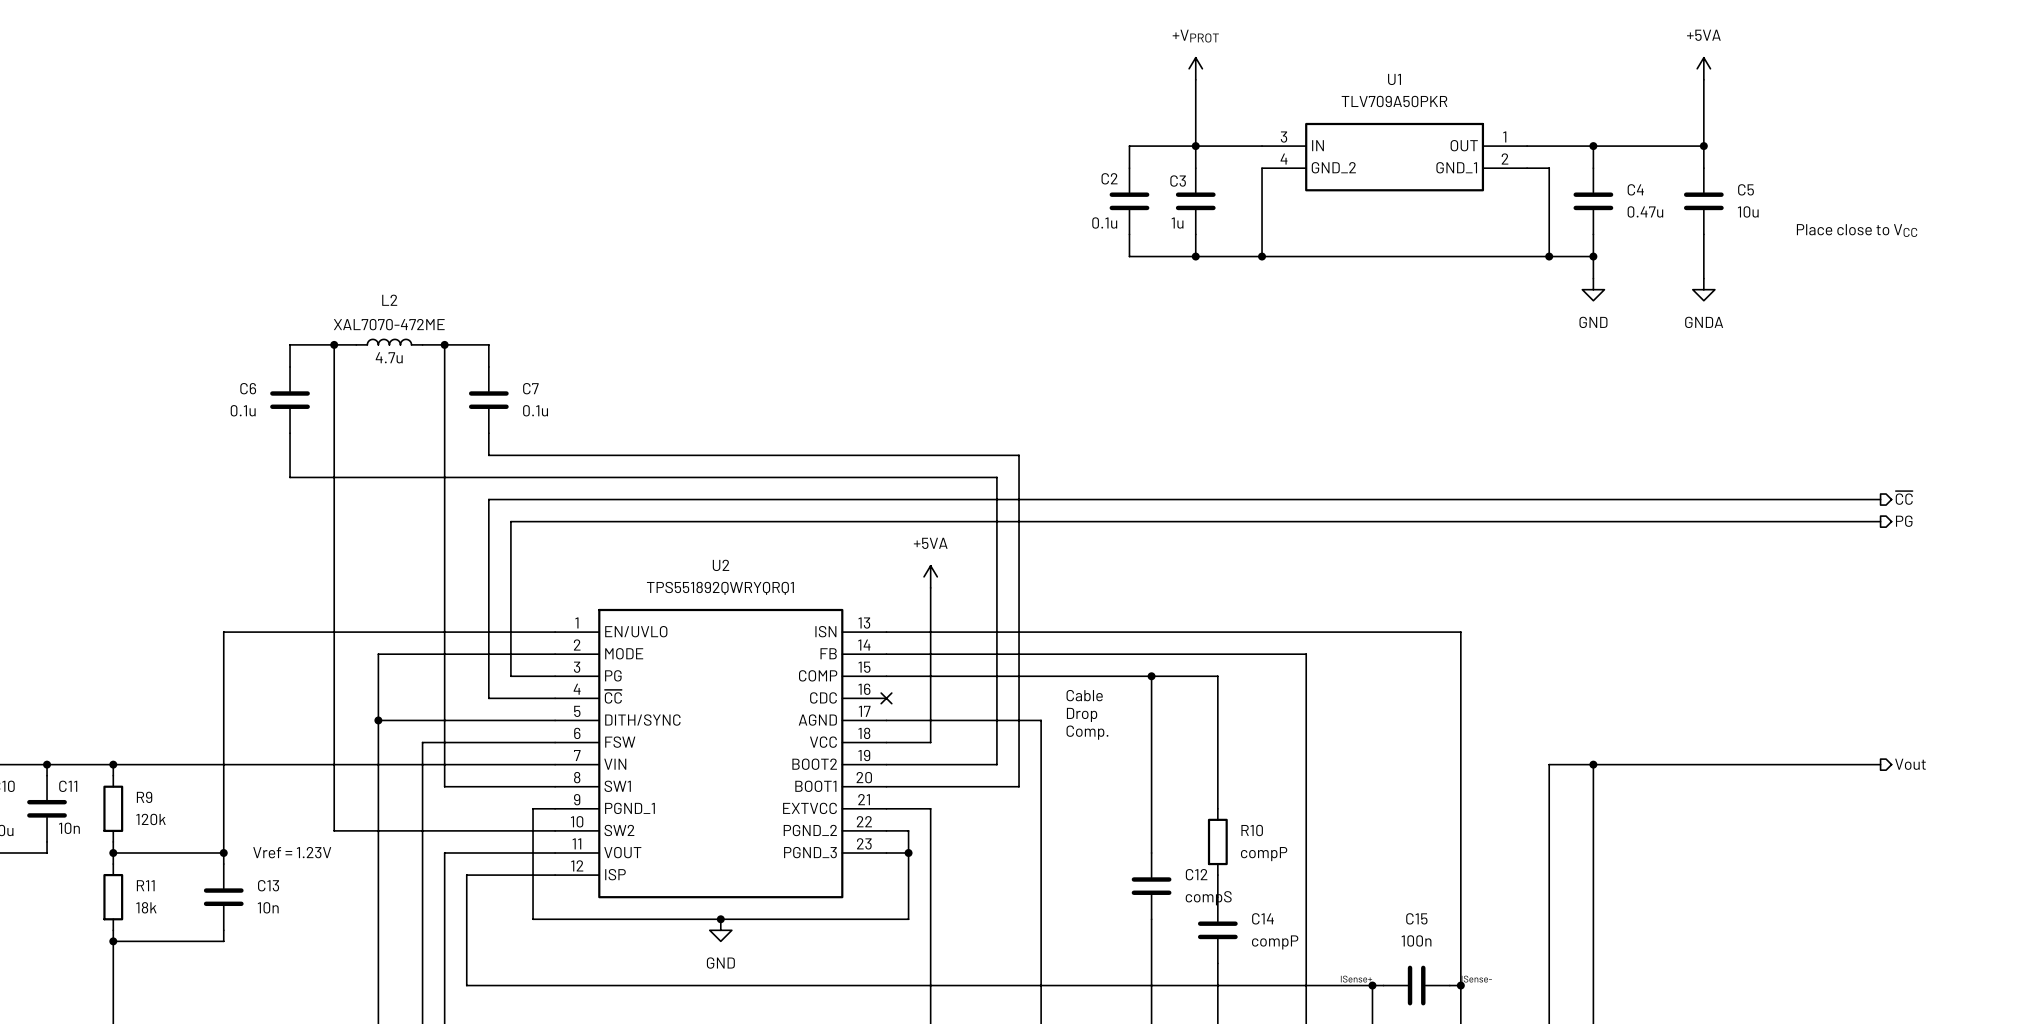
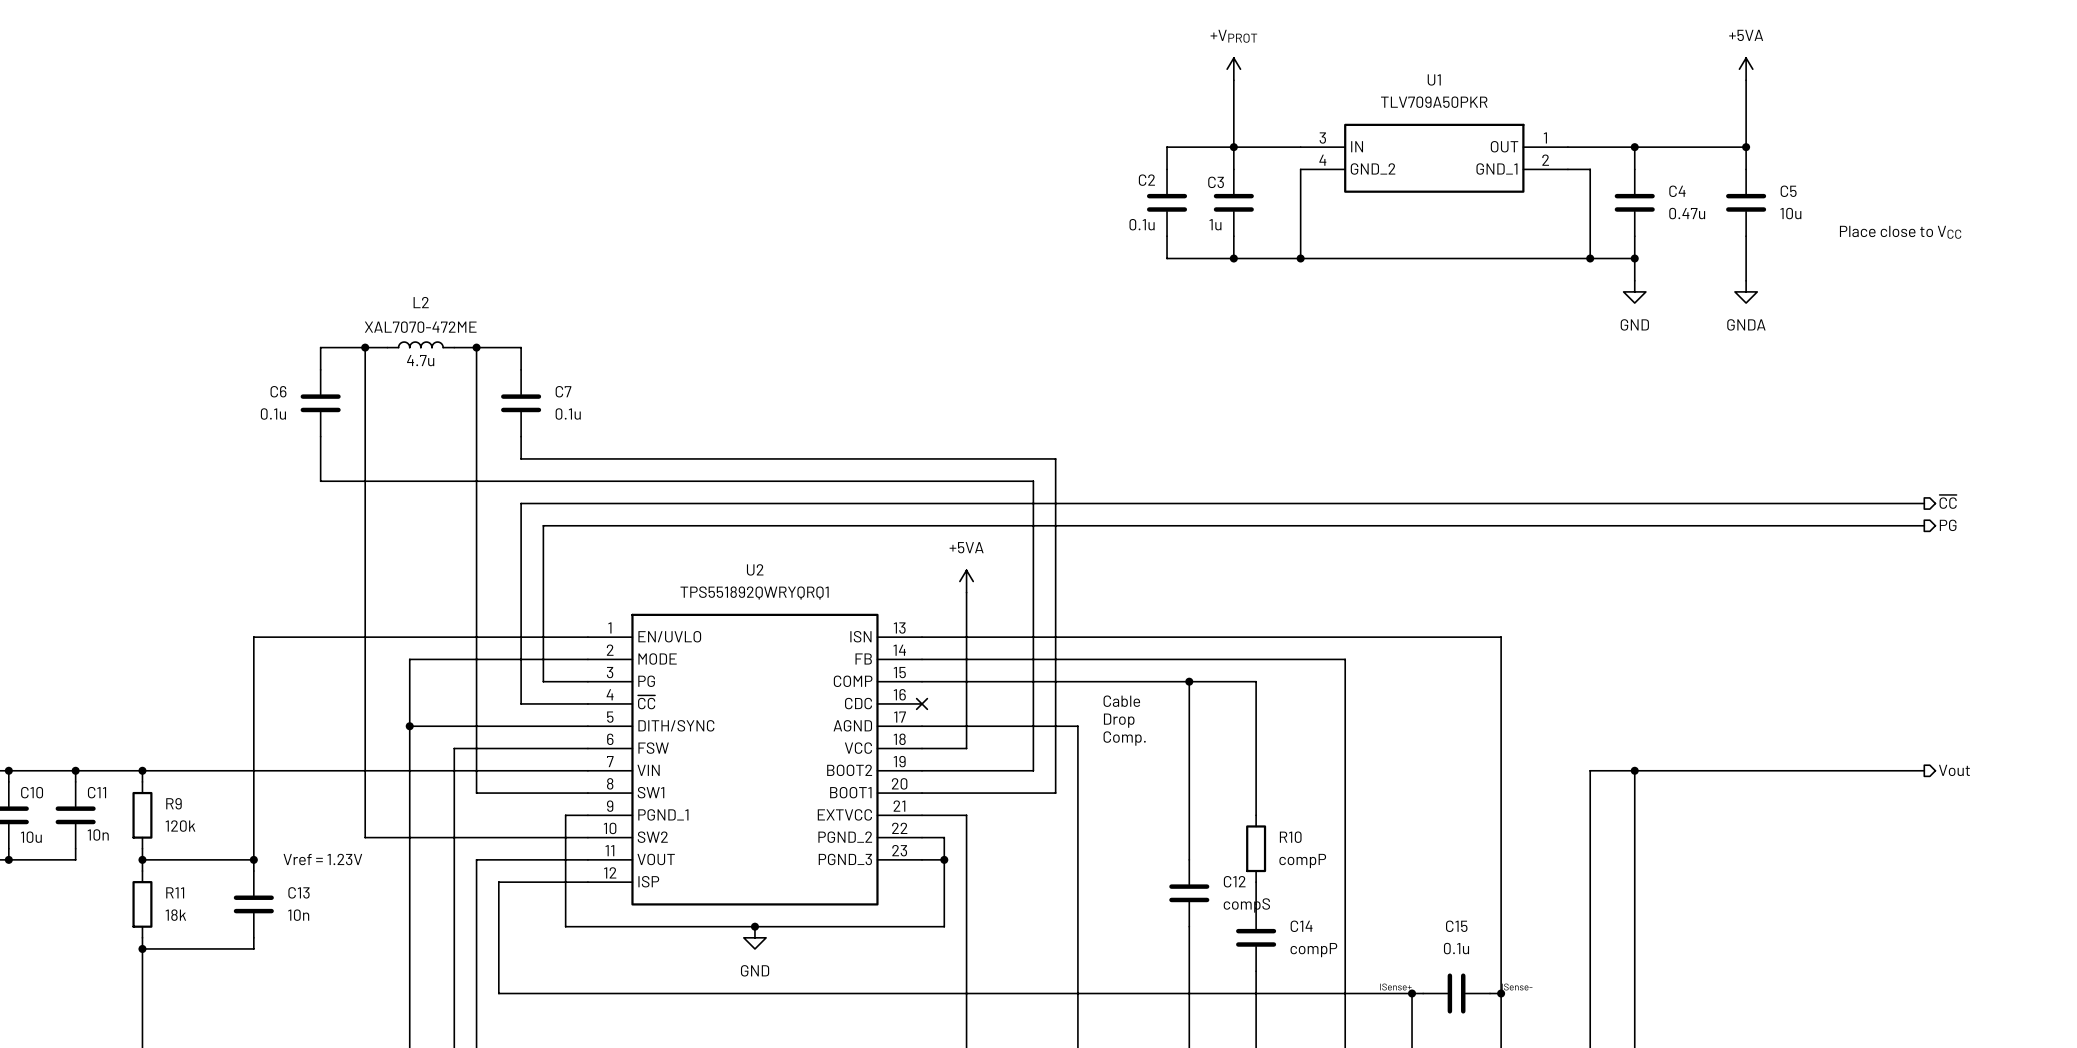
C15 value: 100n (1416, 940) -> 0.1u (1456, 948)

